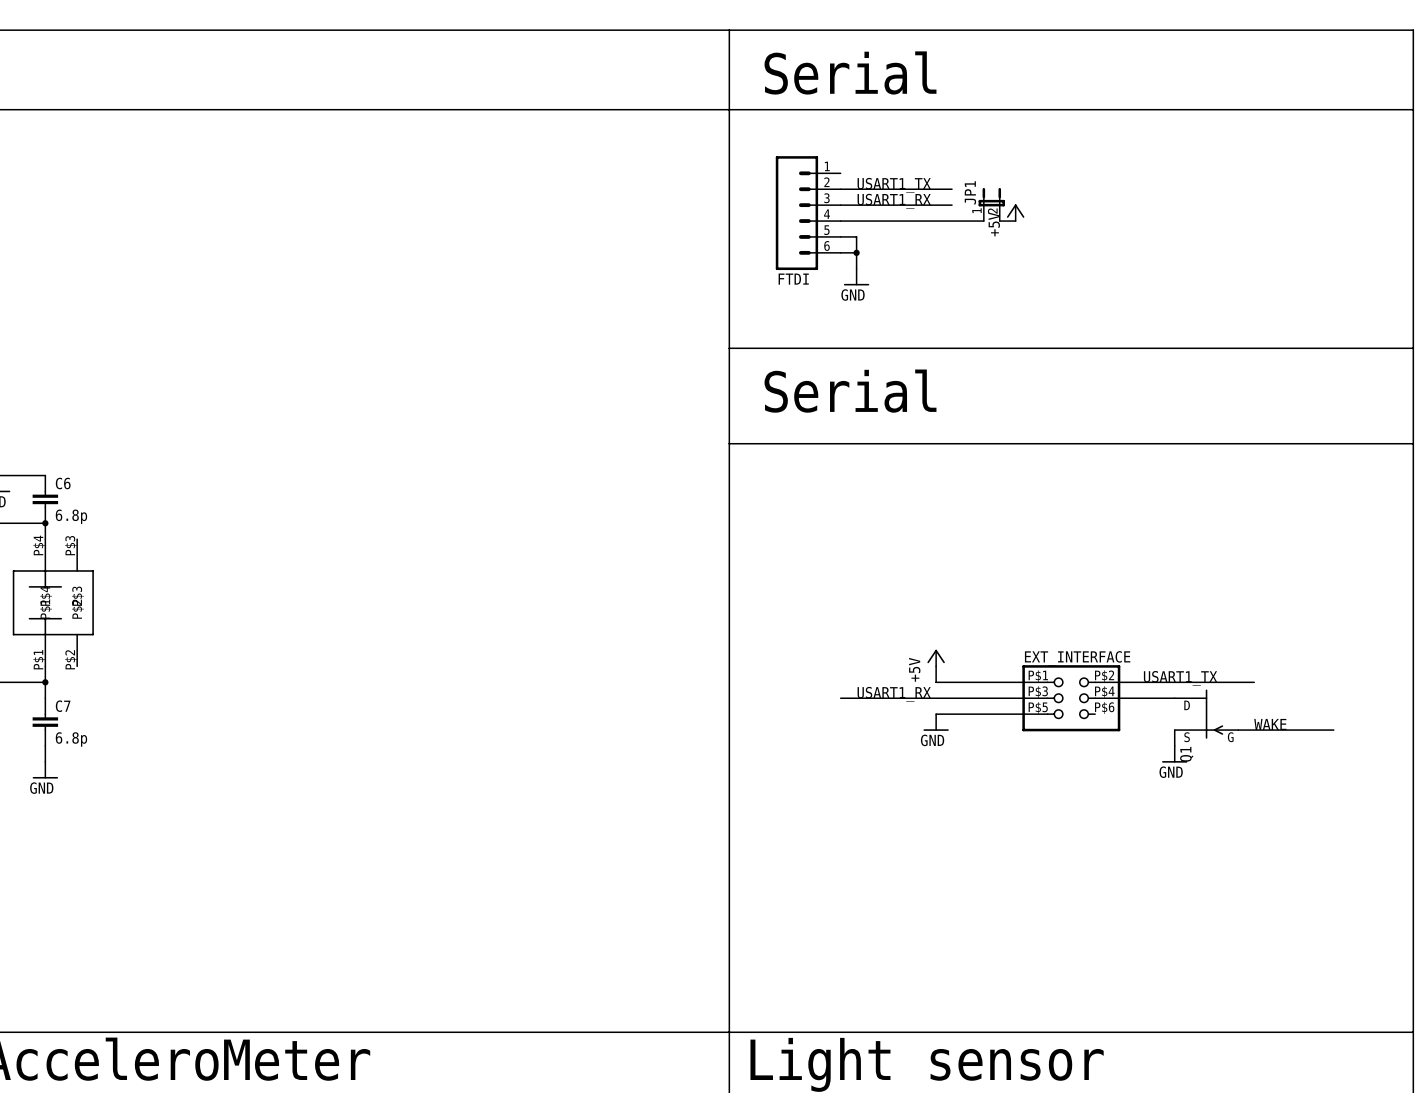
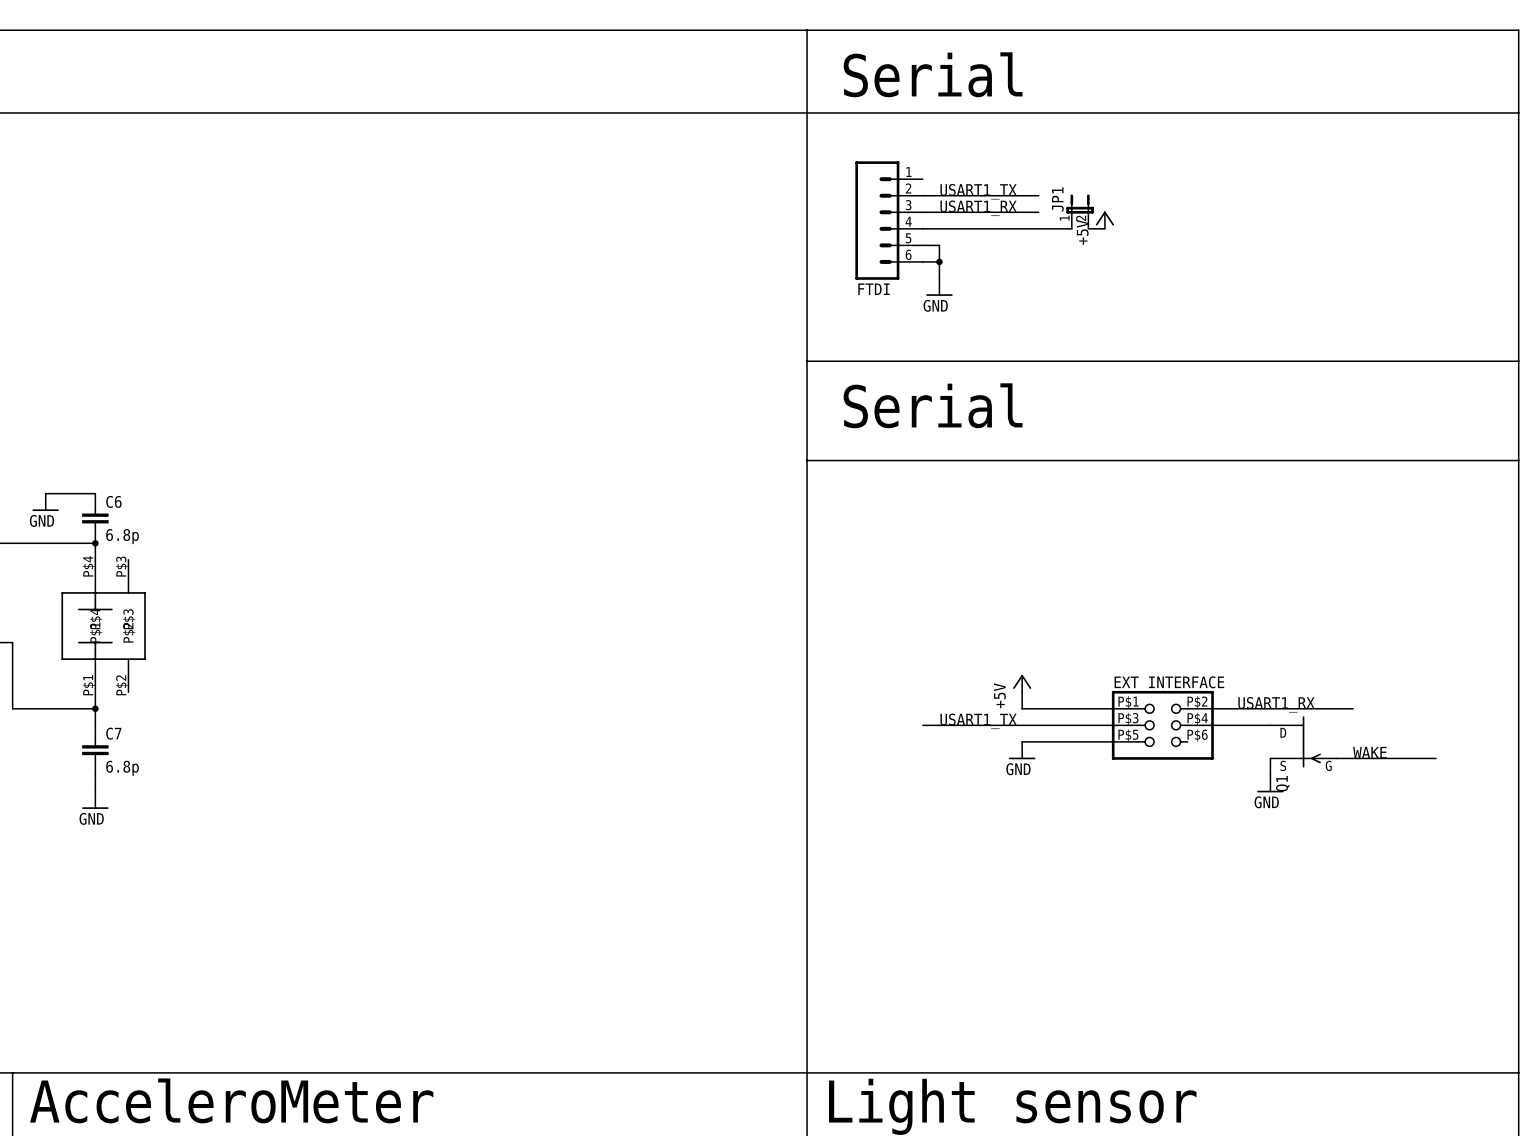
label: USART1_TX (1180, 678) -> USART1_RX (1276, 704)
label: USART1_RX (894, 694) -> USART1_TX (978, 721)

